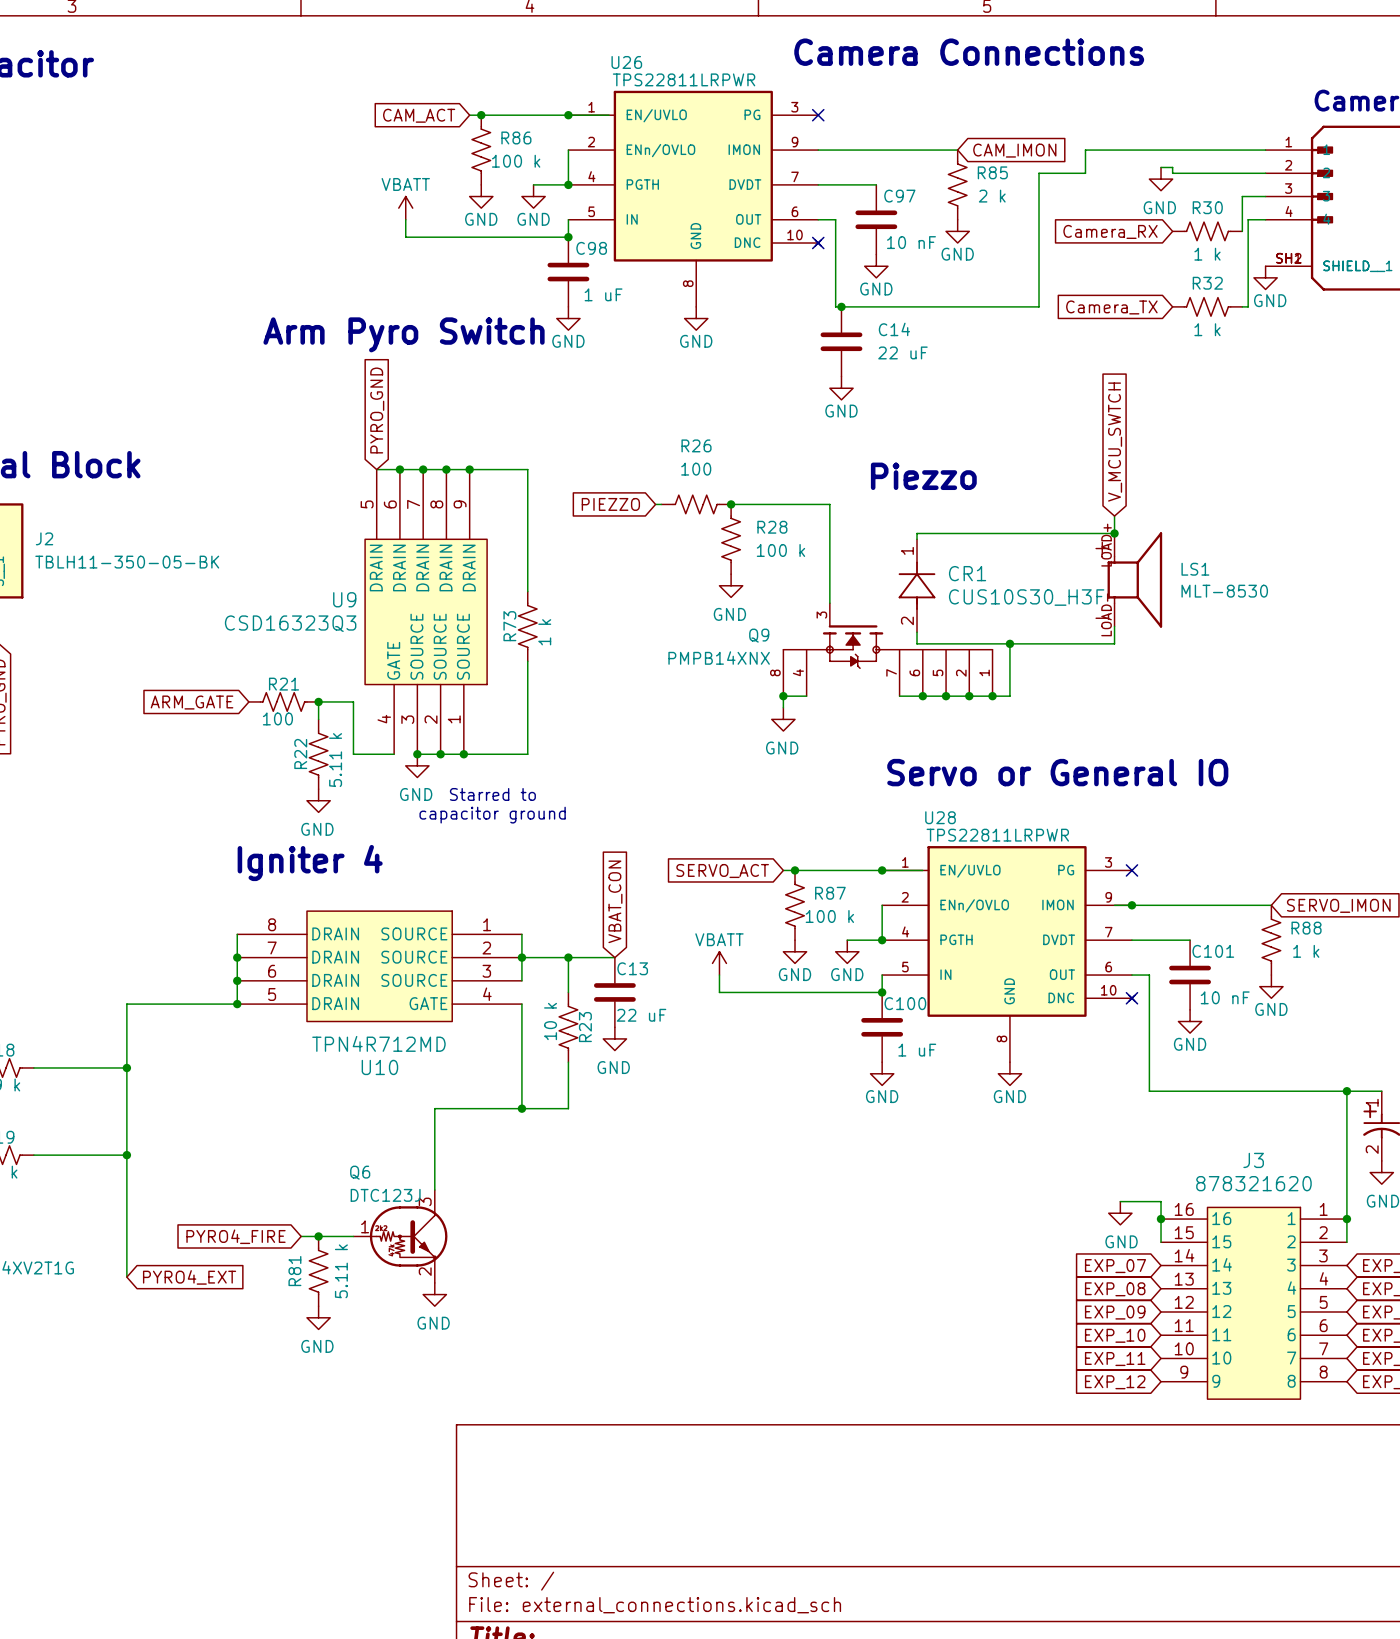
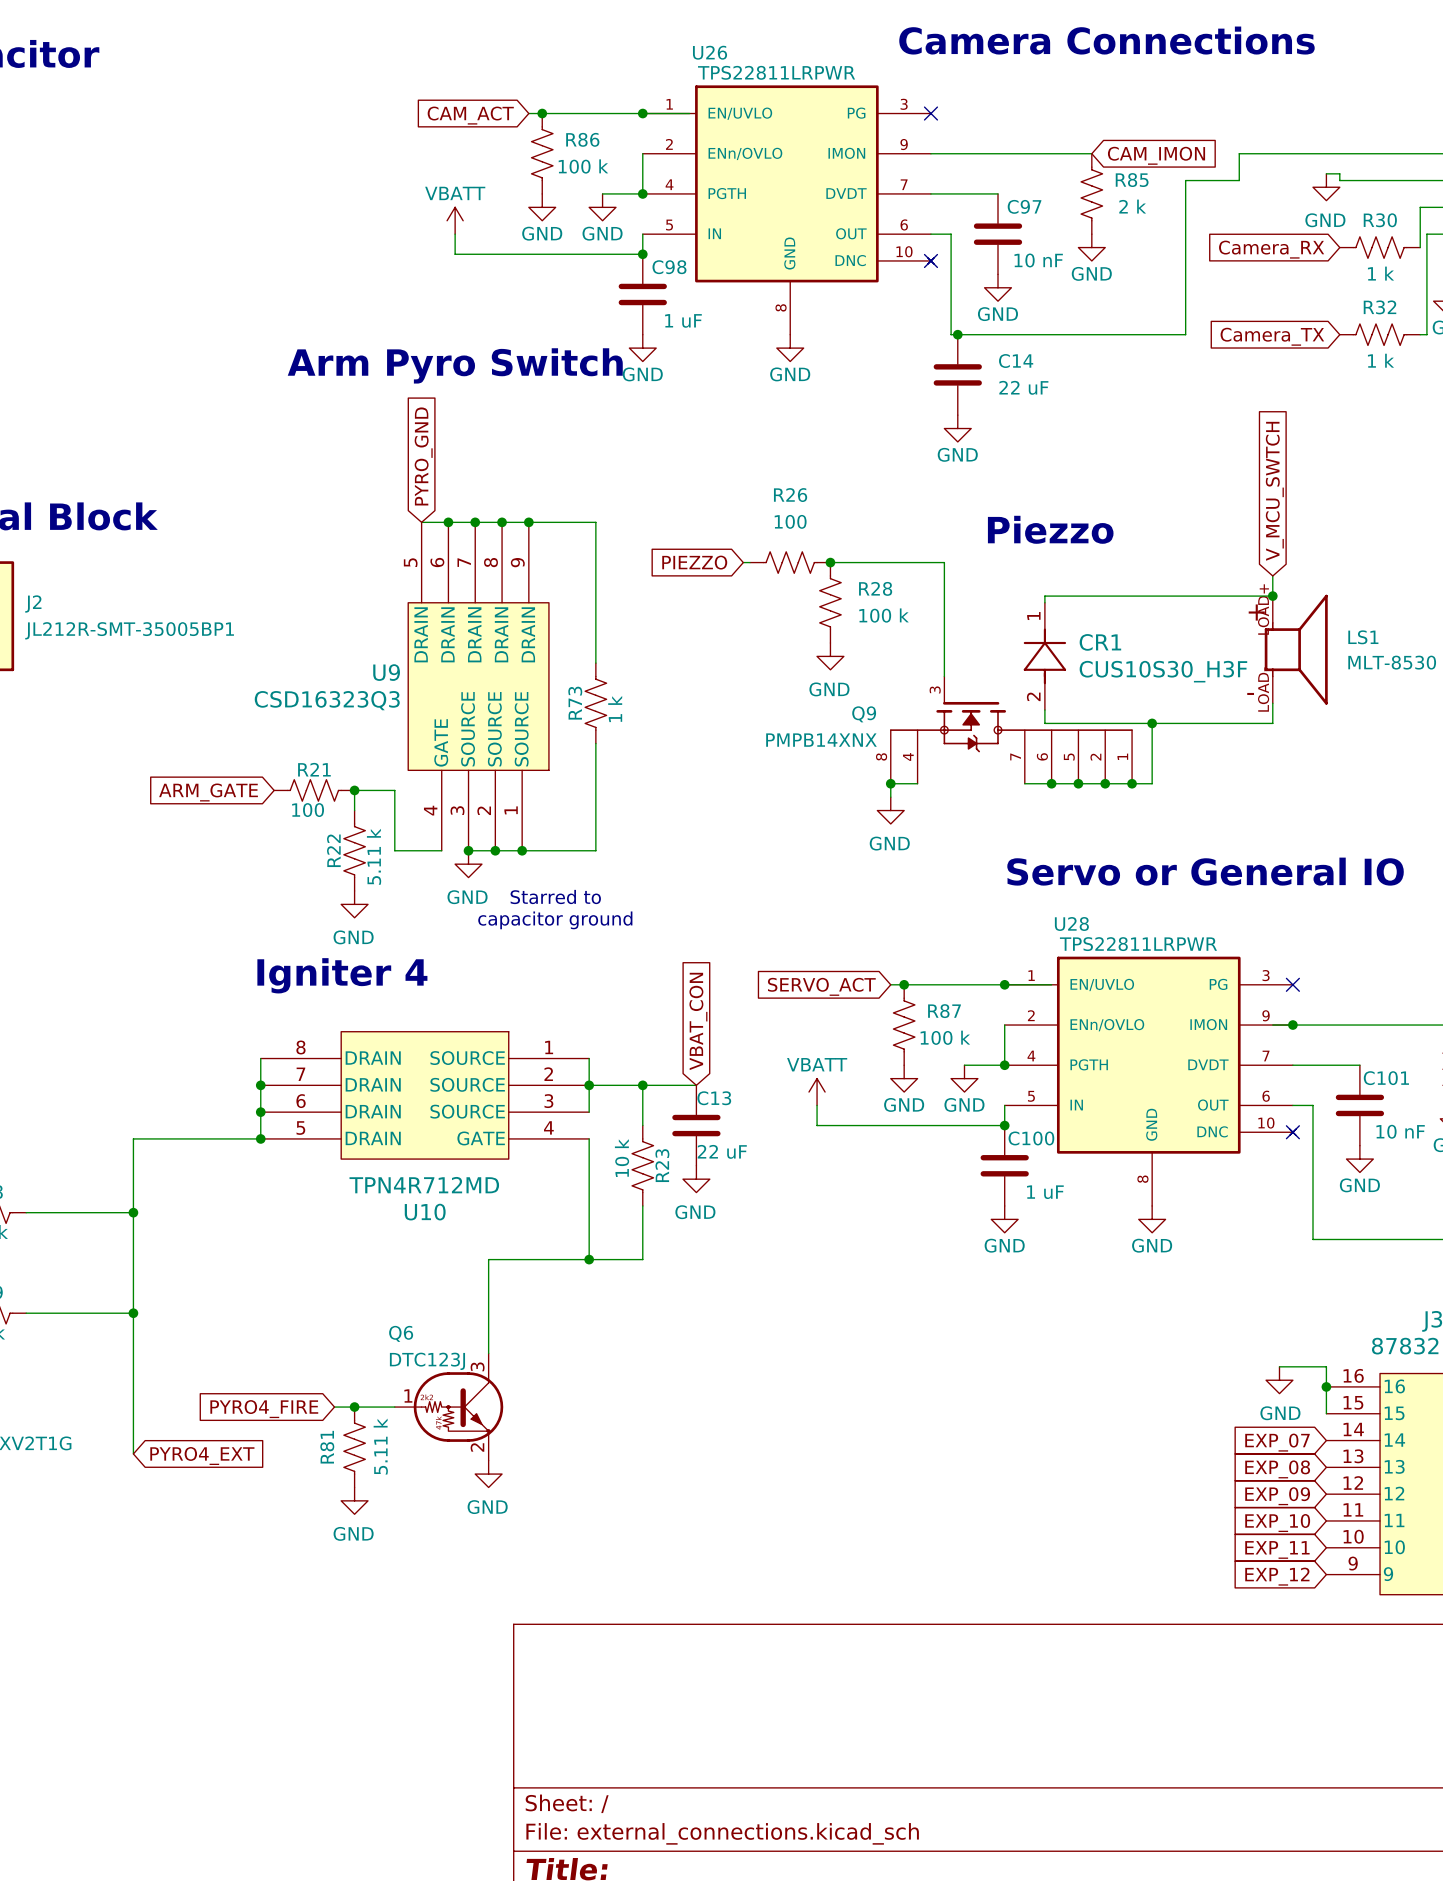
J2 value: TBLH11-350-05-BK (127, 562) -> JL212R-SMT-35005BP1 (129, 630)

